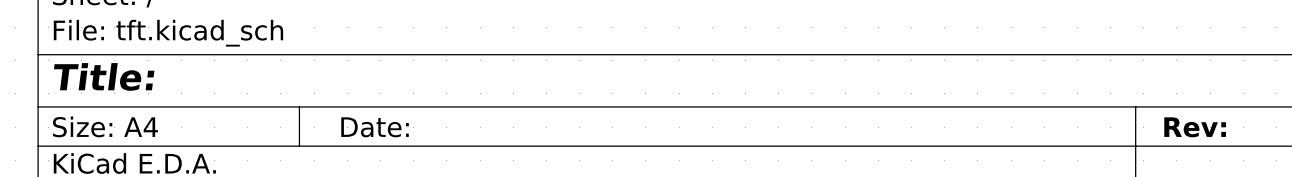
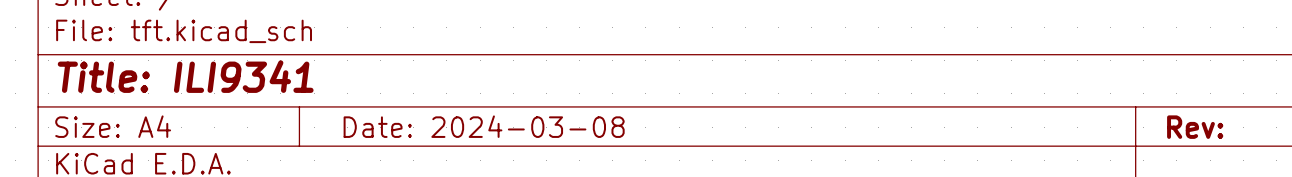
title block: Title: (104, 76) -> Title: ILI9341 (185, 76)
title block: Date: (375, 127) -> Date: 2024-03-08 (484, 126)

